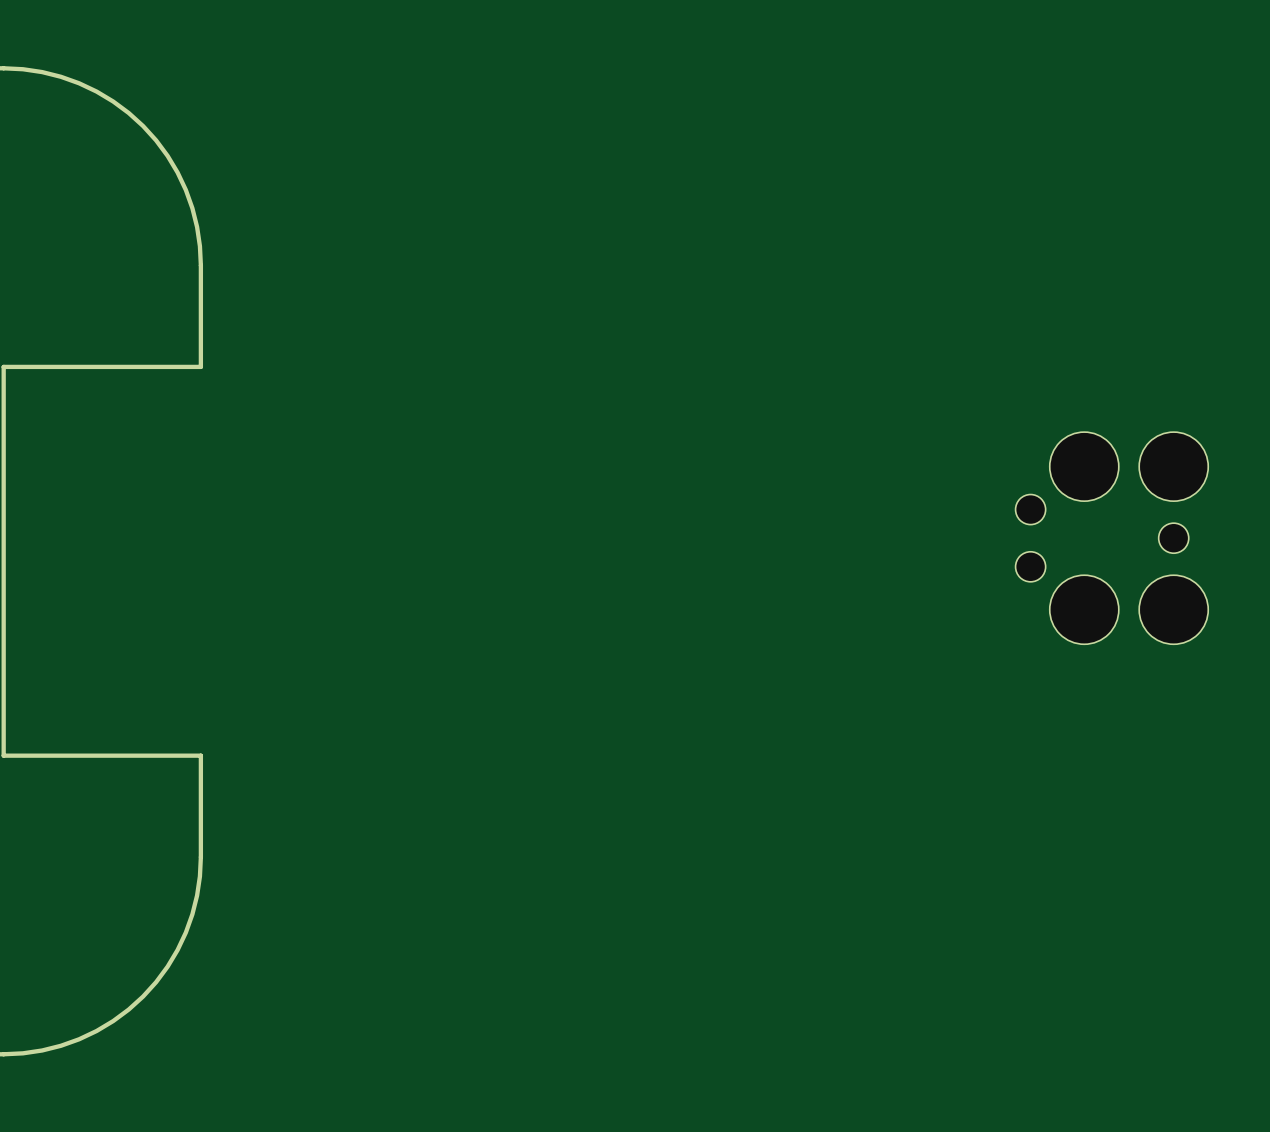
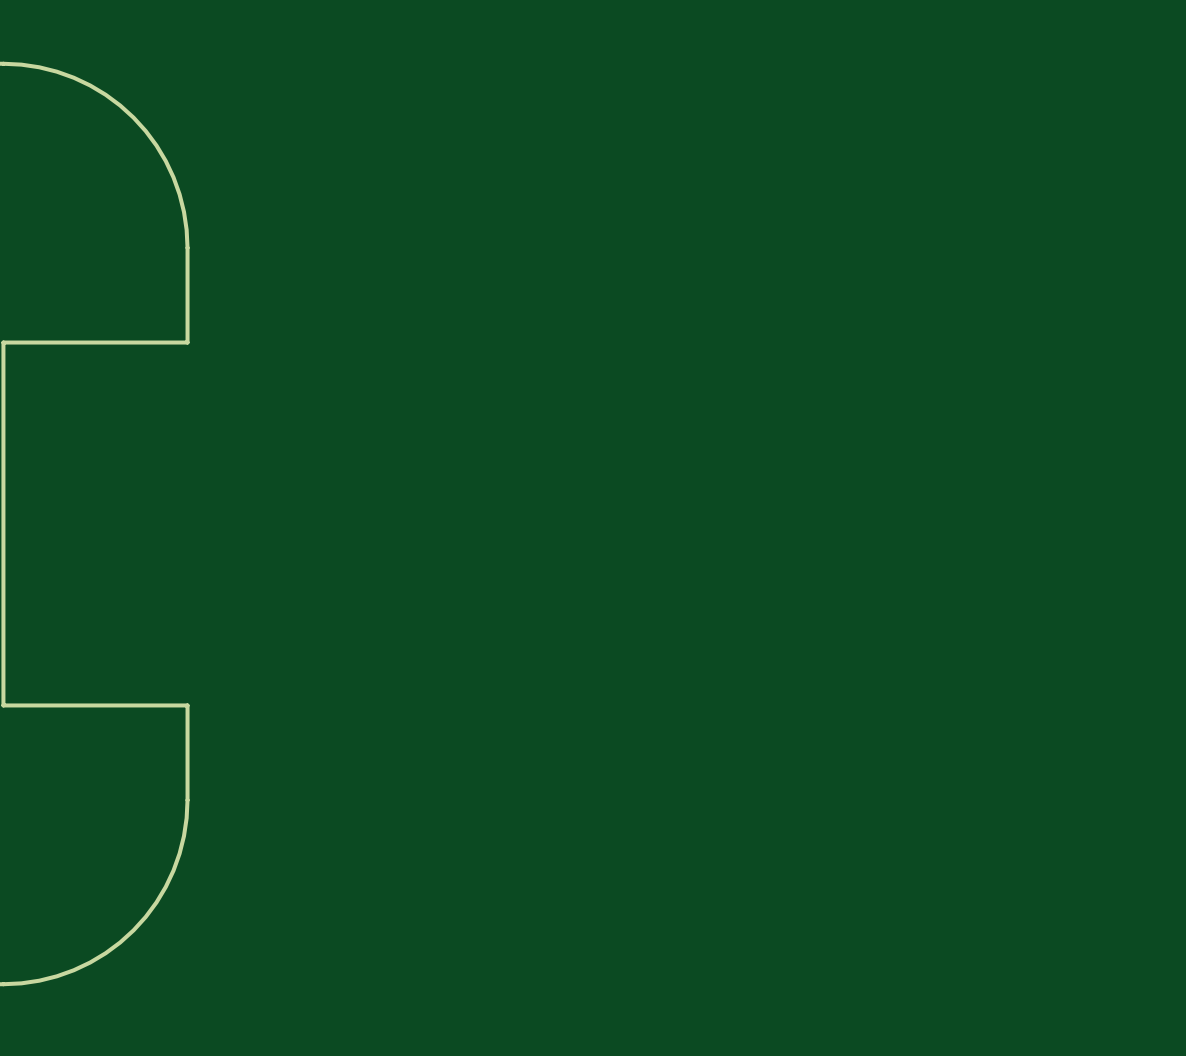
part: (1111, 538) -> none

